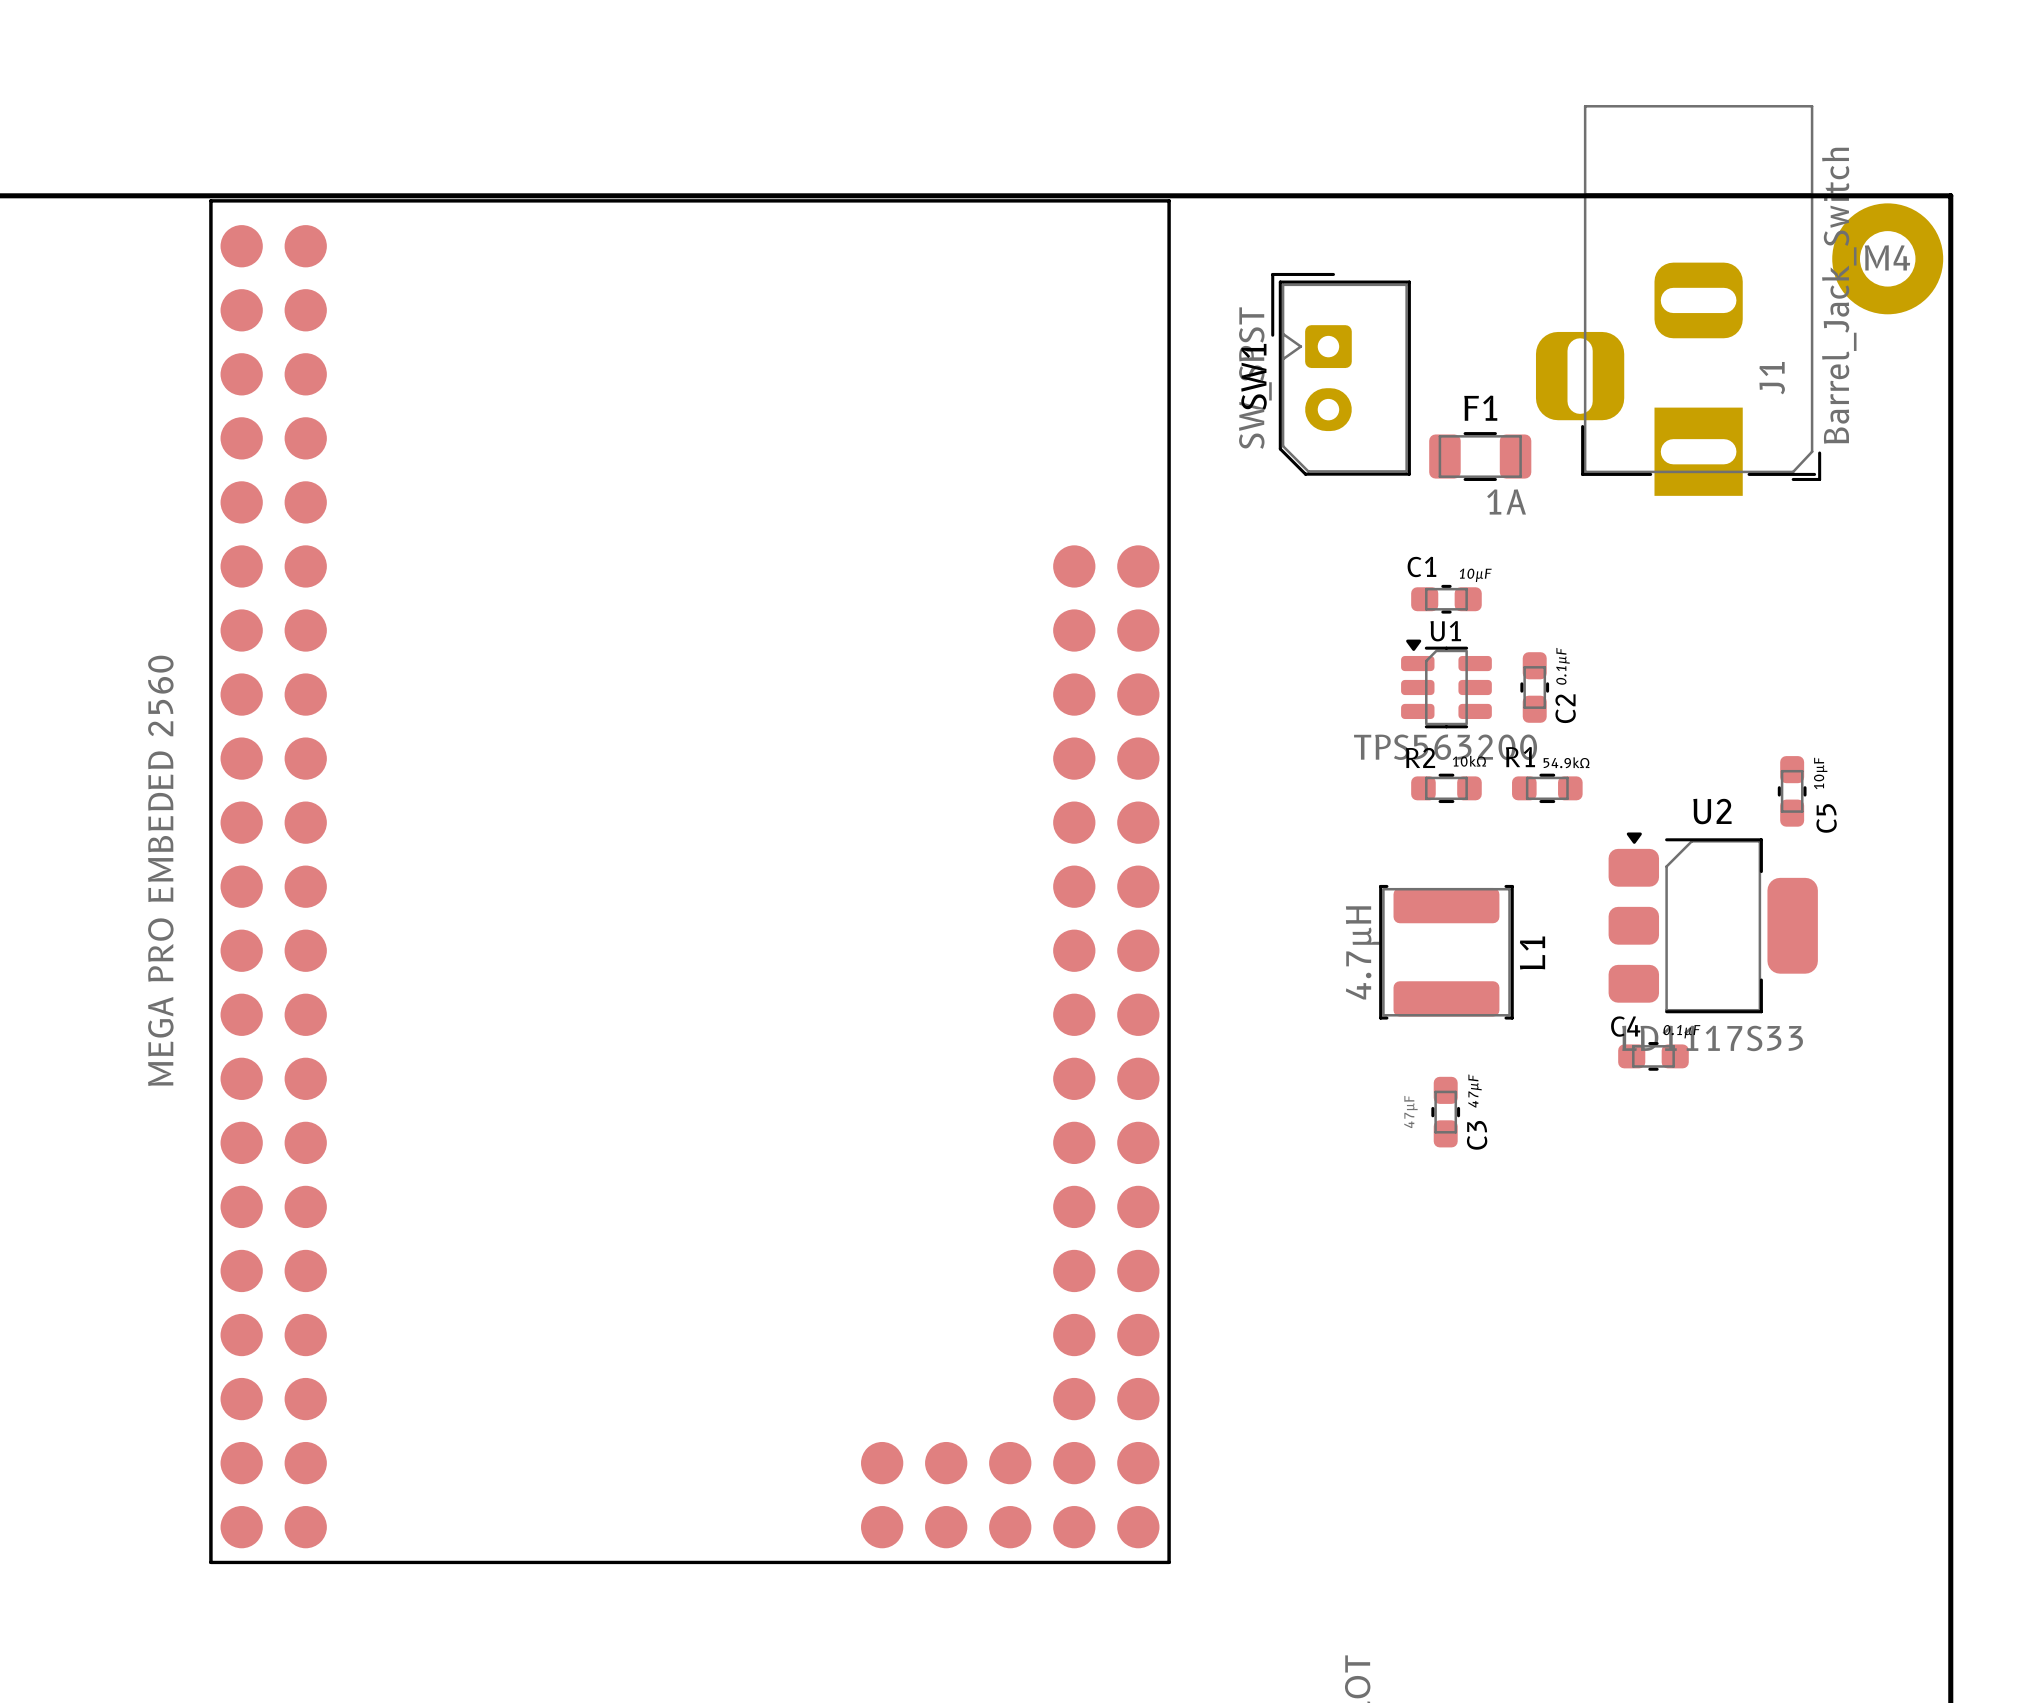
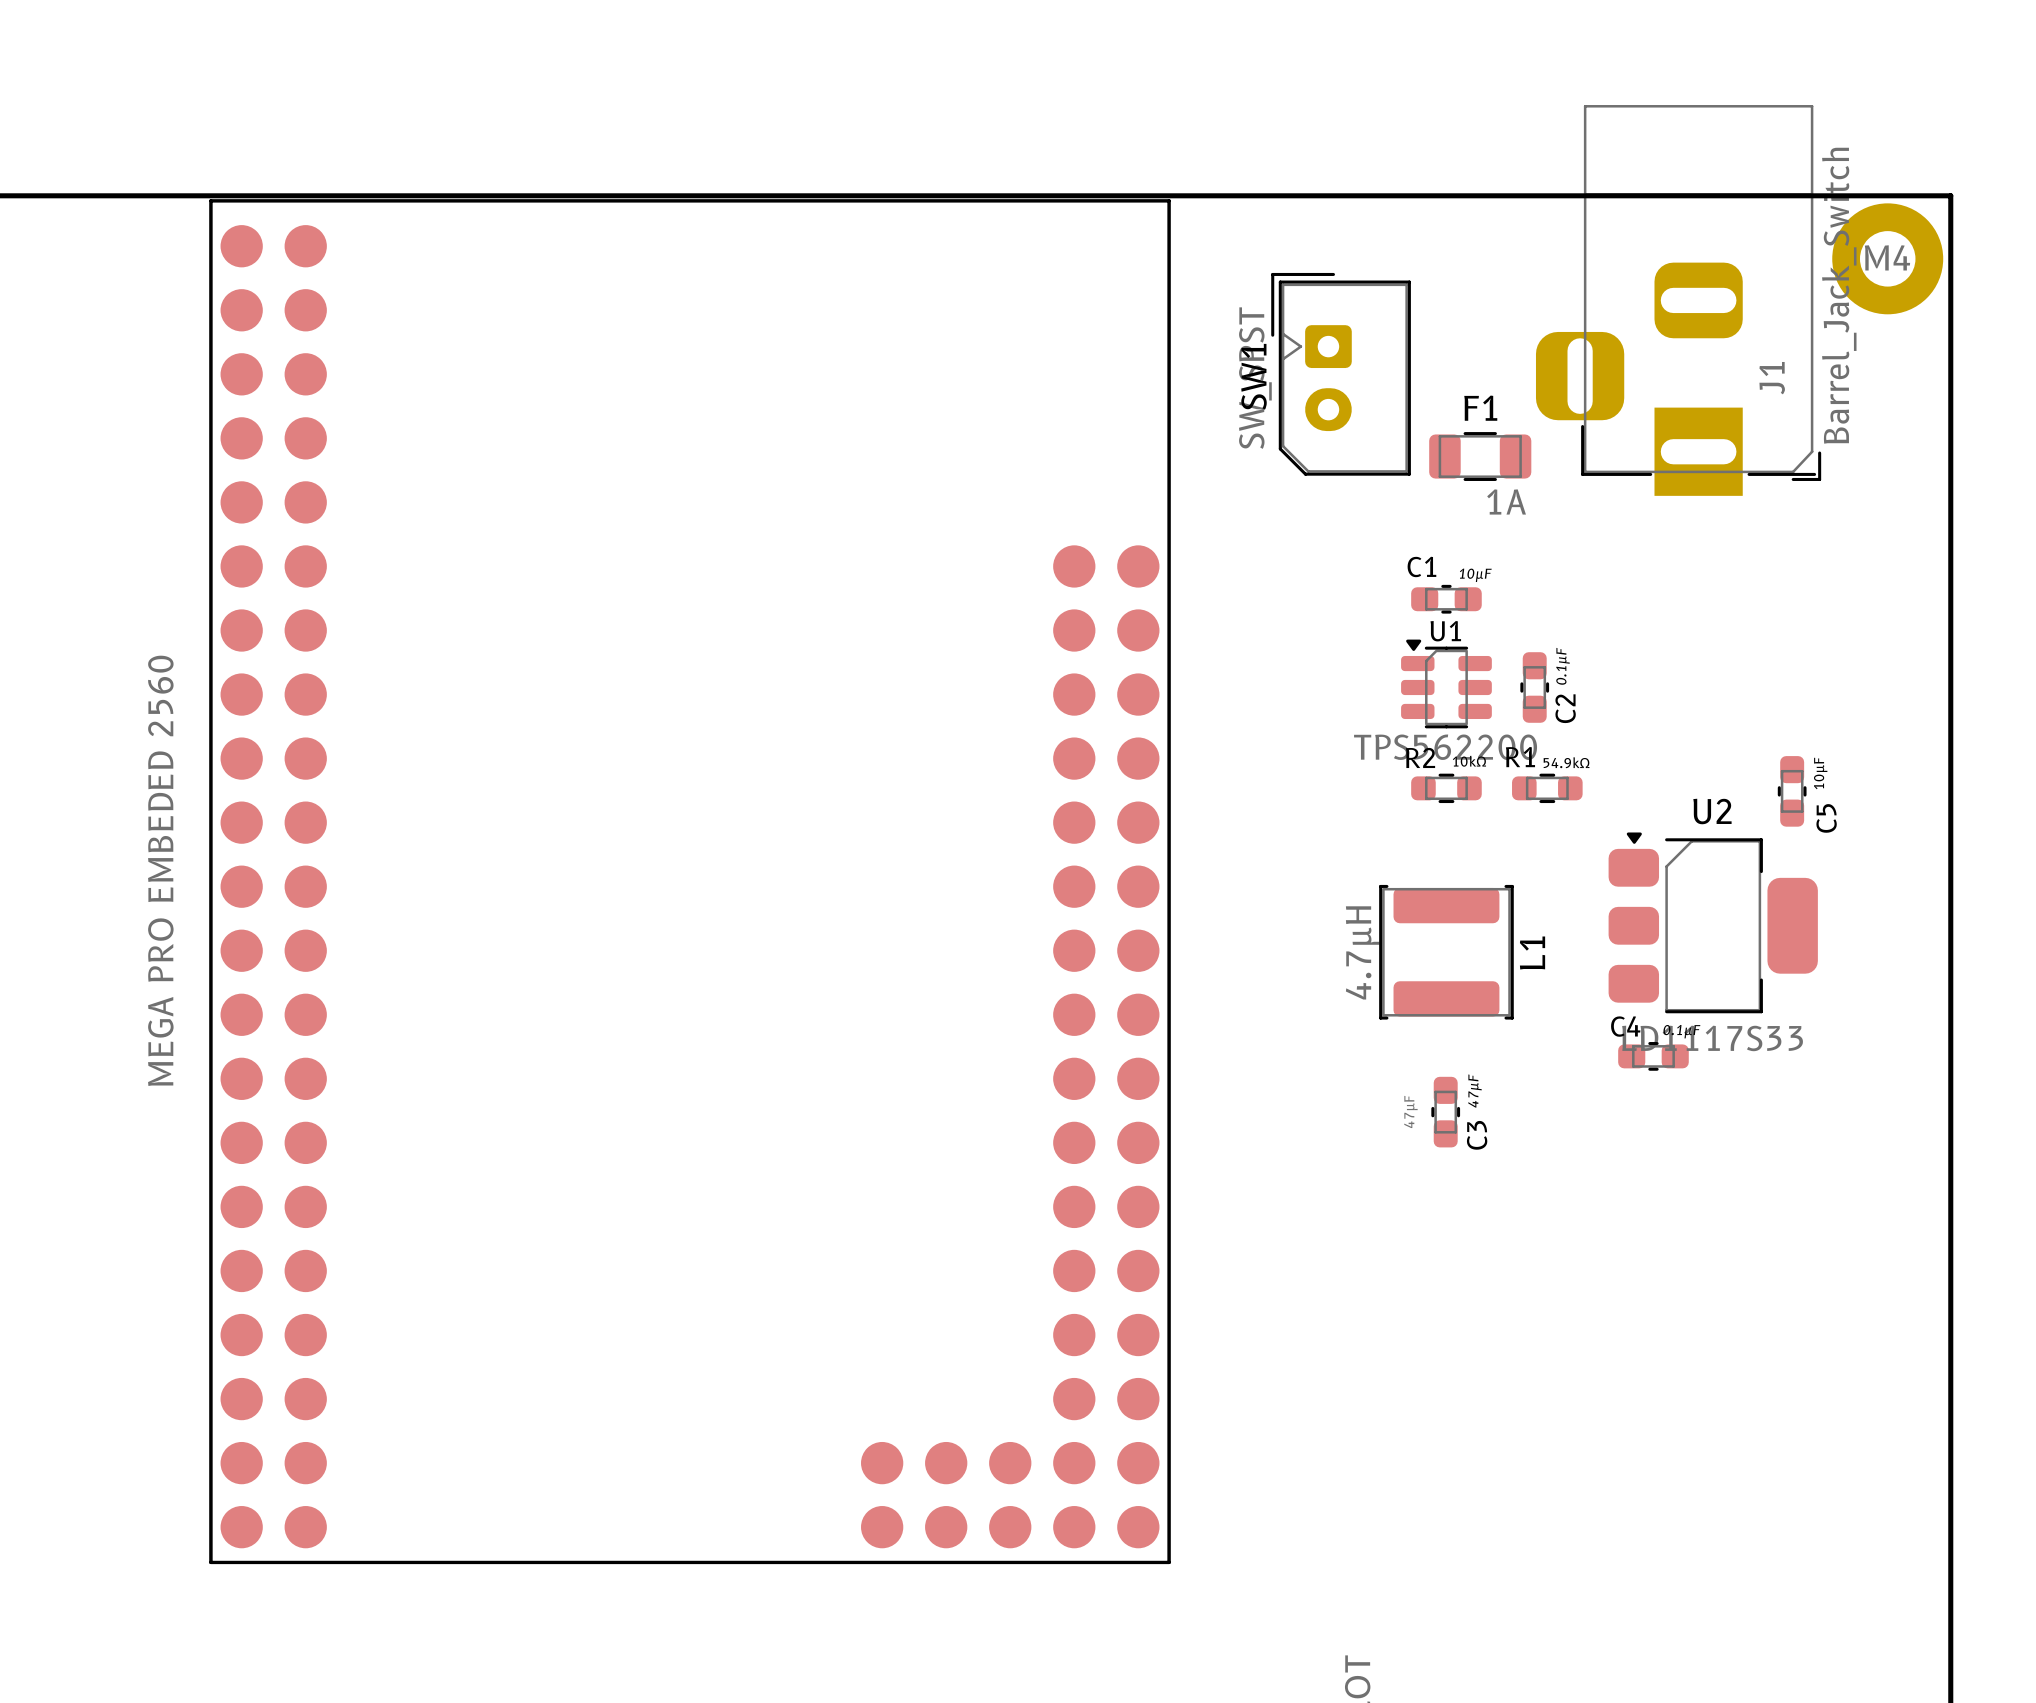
U1 value: TPS563200 (1445, 747) -> TPS562200 (1445, 747)

